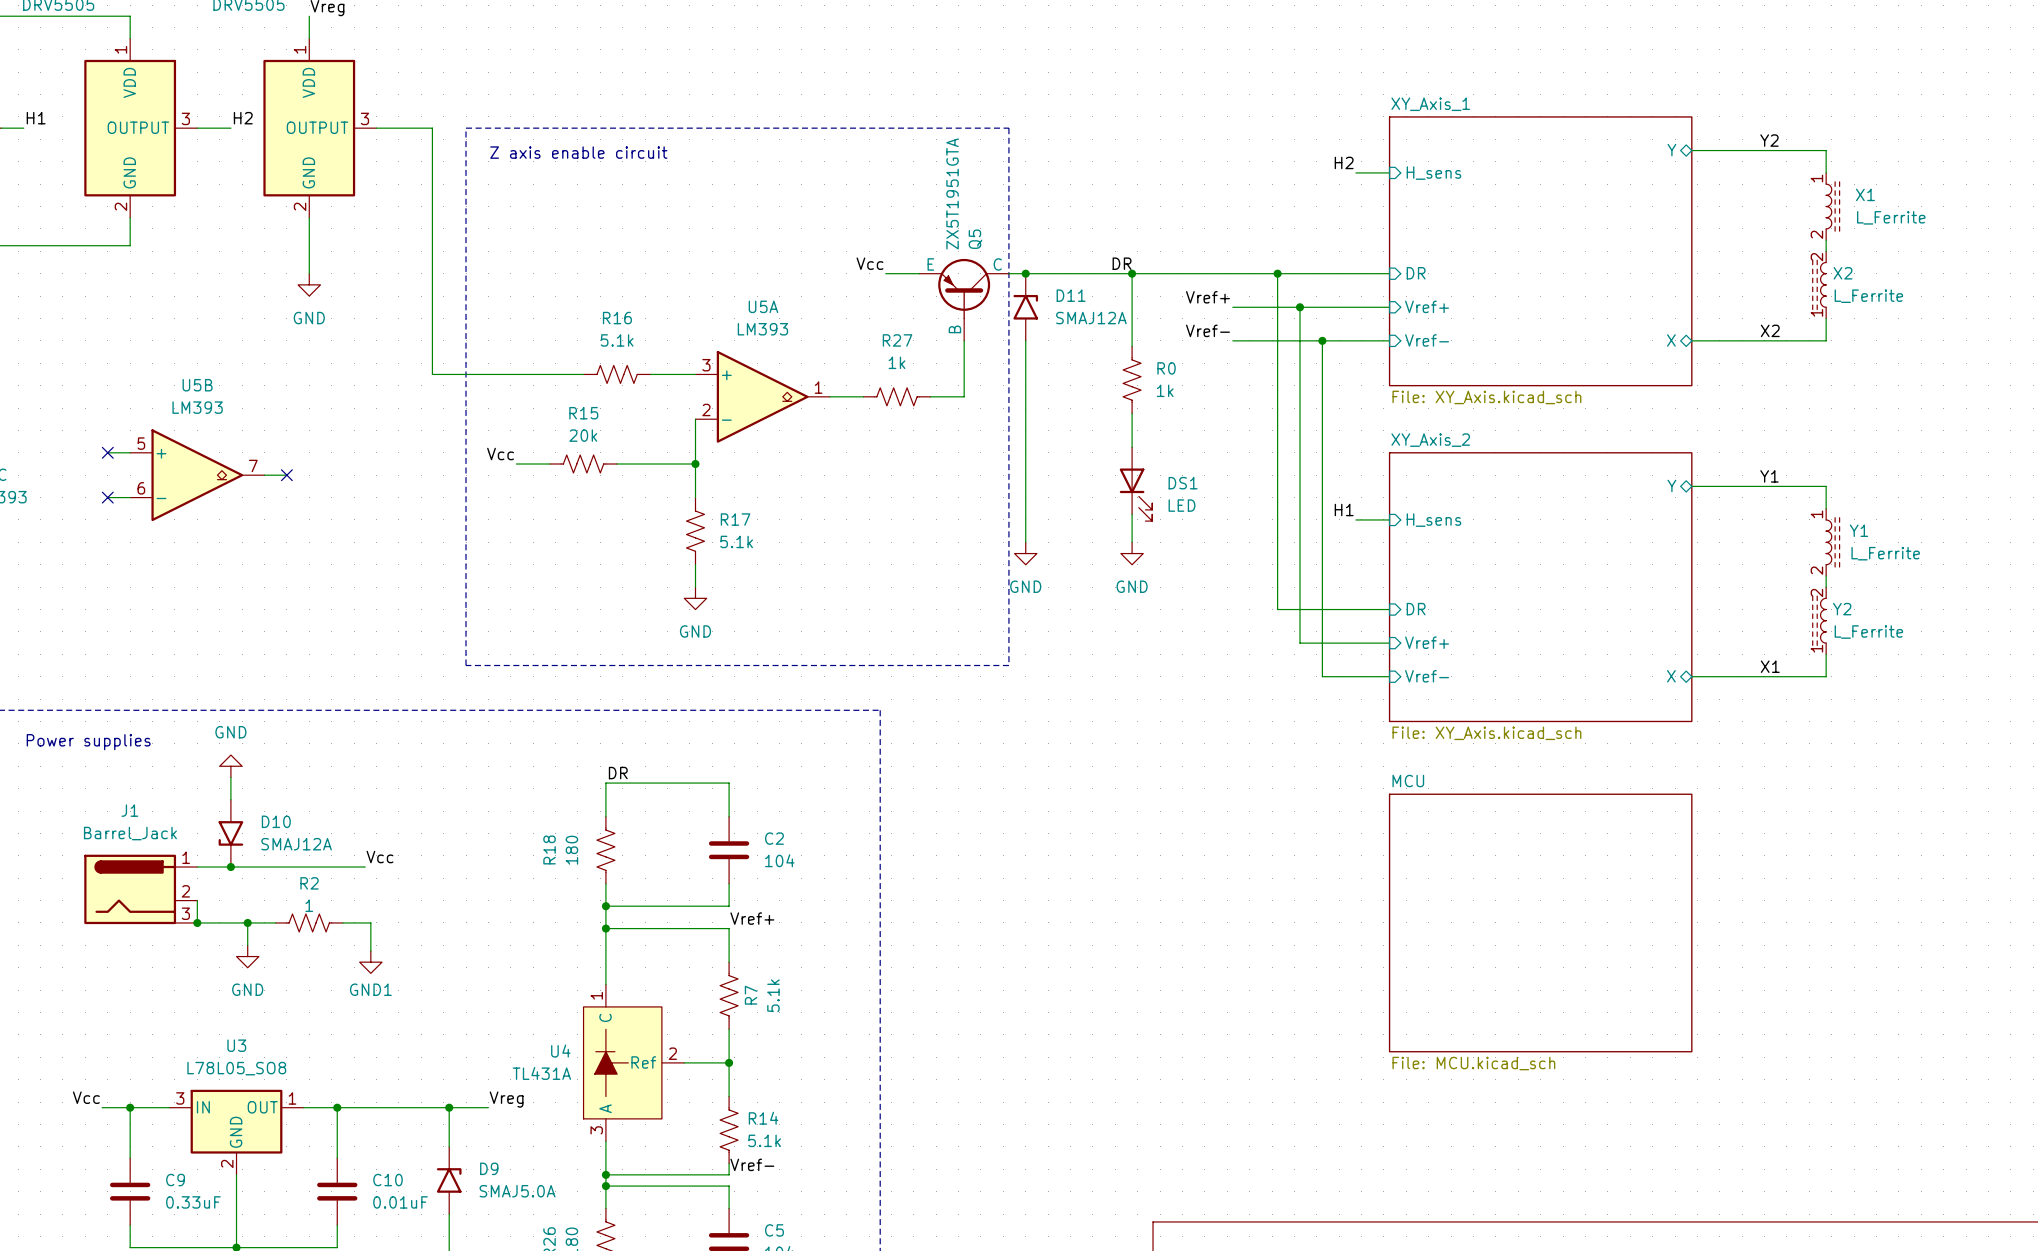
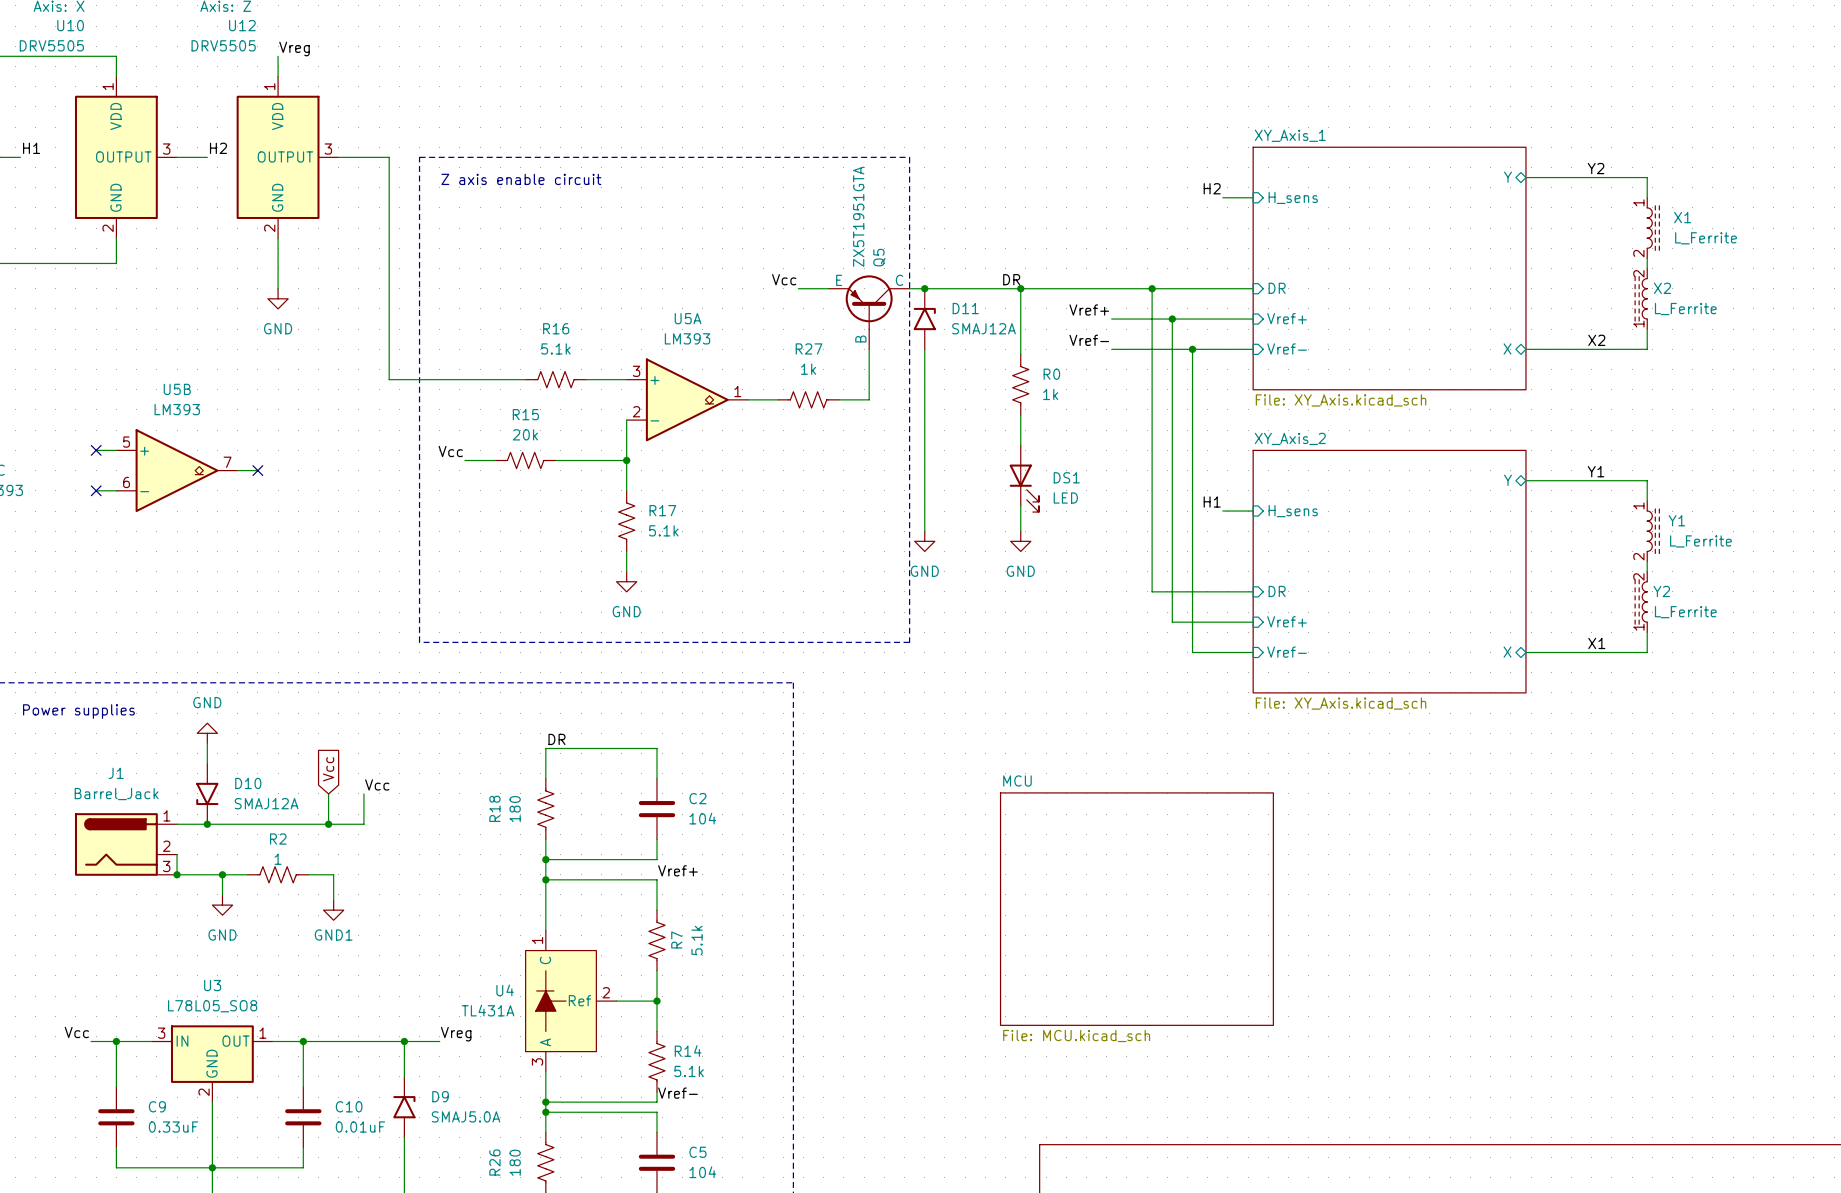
global label: none -> Vcc (328, 769)
wire: none -> (328, 793) (328, 824) (363, 824) (363, 793)
label position: Vcc (379, 857) -> Vcc (377, 784)
junction: none -> (328, 824)
sheet MCU: File: MCU.kicad_sch (1540, 922) -> none
sheet MCU: none -> File: MCU.kicad_sch (1136, 909)

